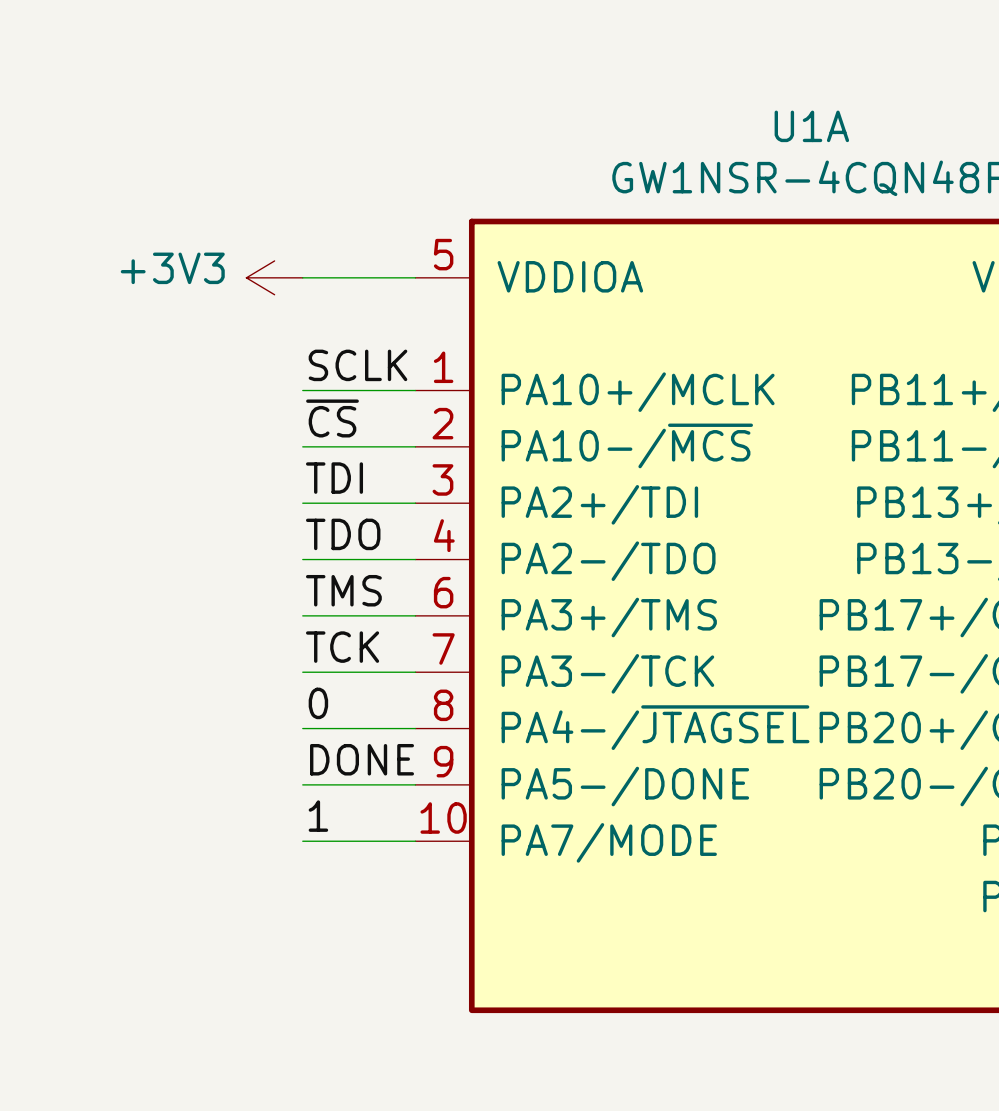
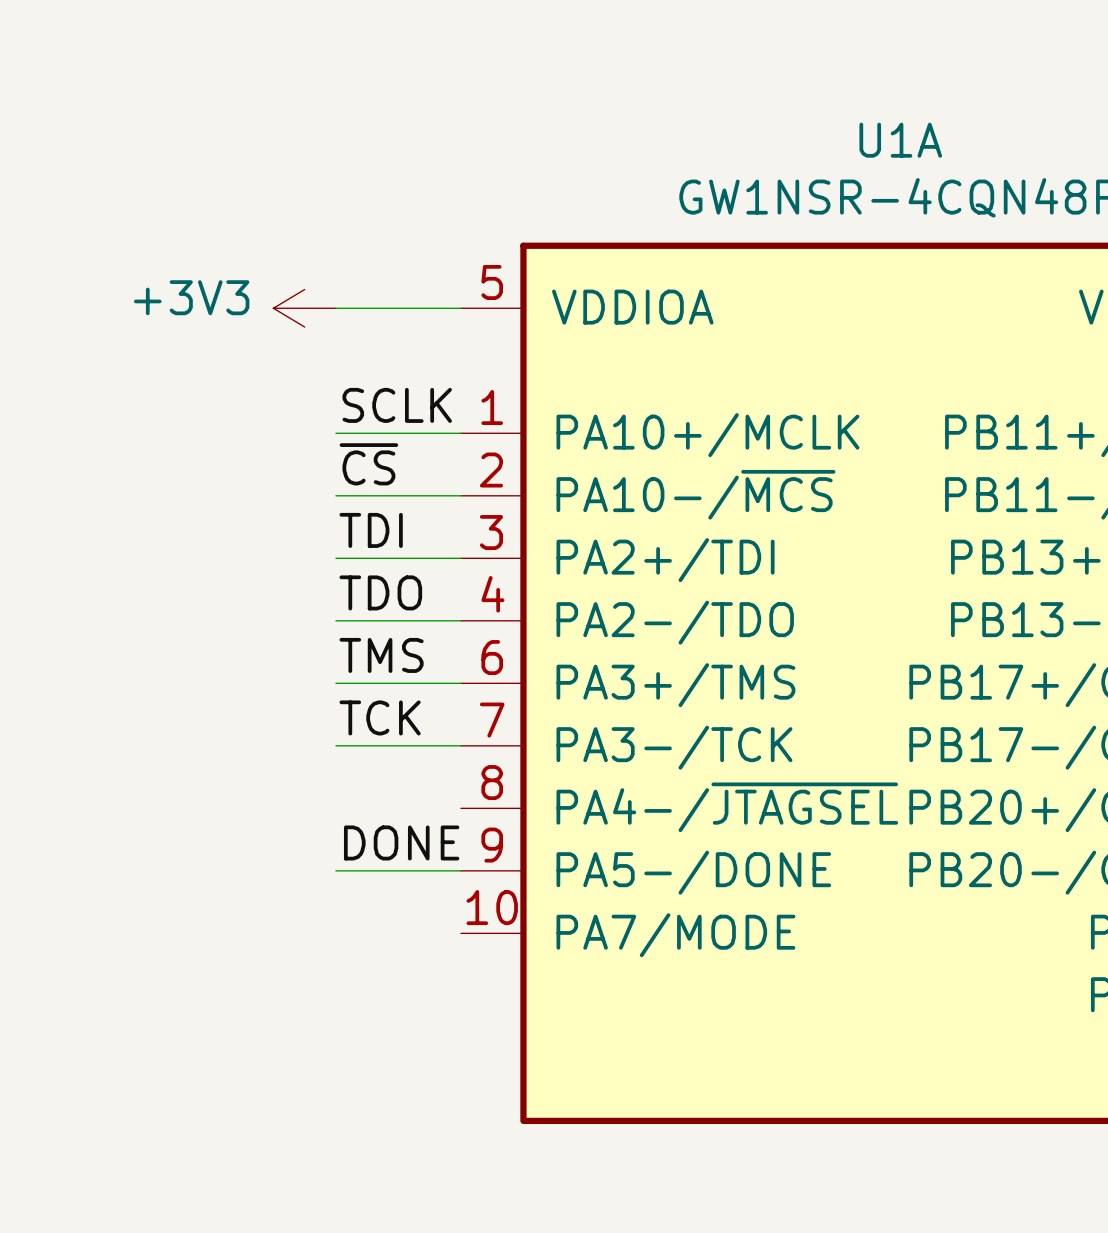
label: 0 (318, 703) -> none
wire: (302, 728) (415, 728) -> none
label: 1 (318, 816) -> none
wire: (302, 841) (415, 841) -> none

